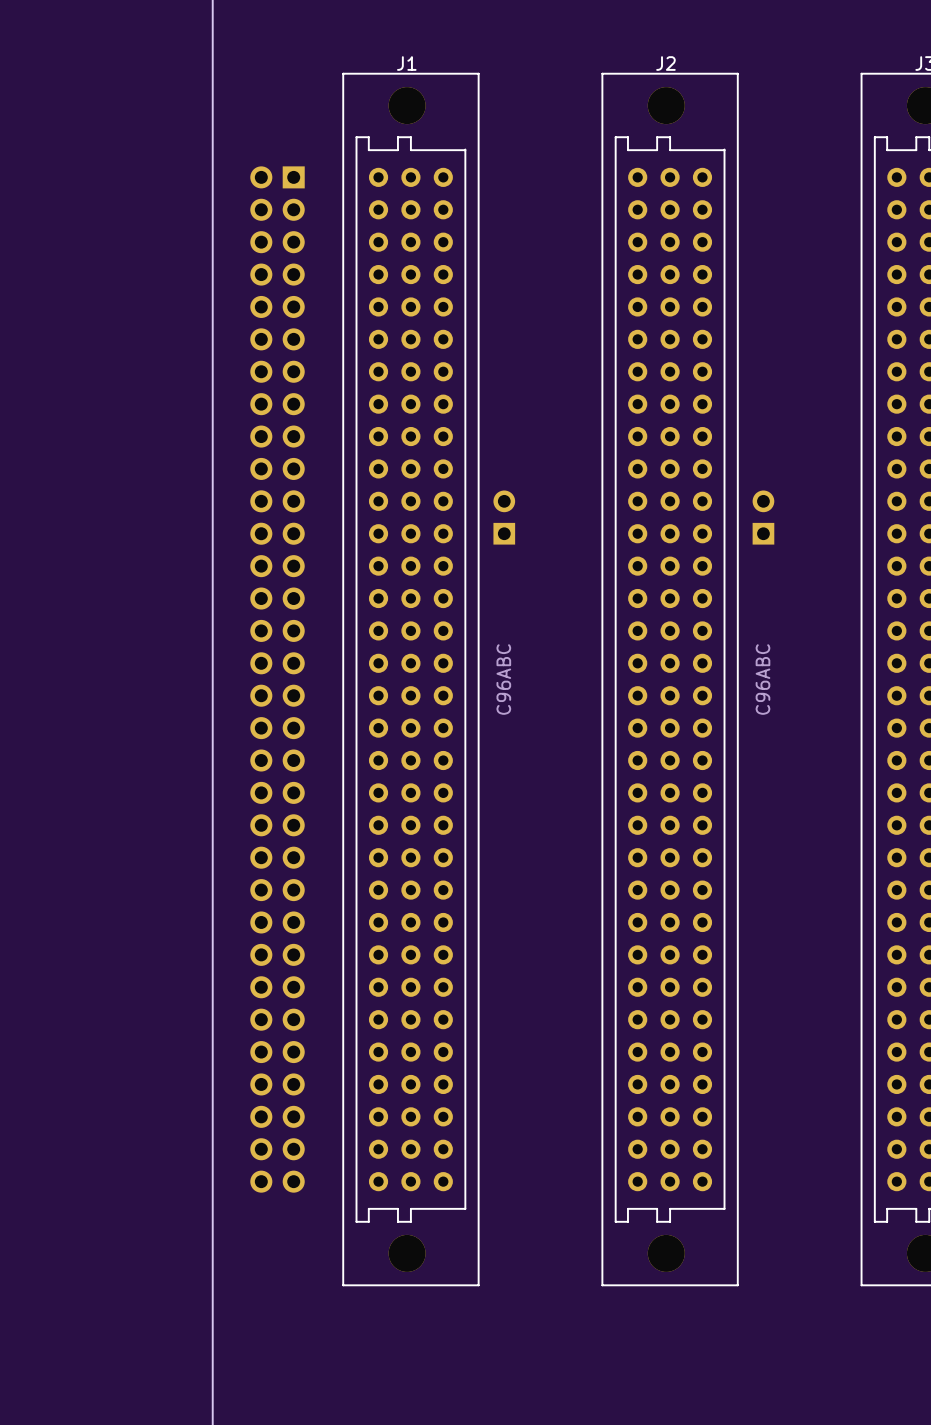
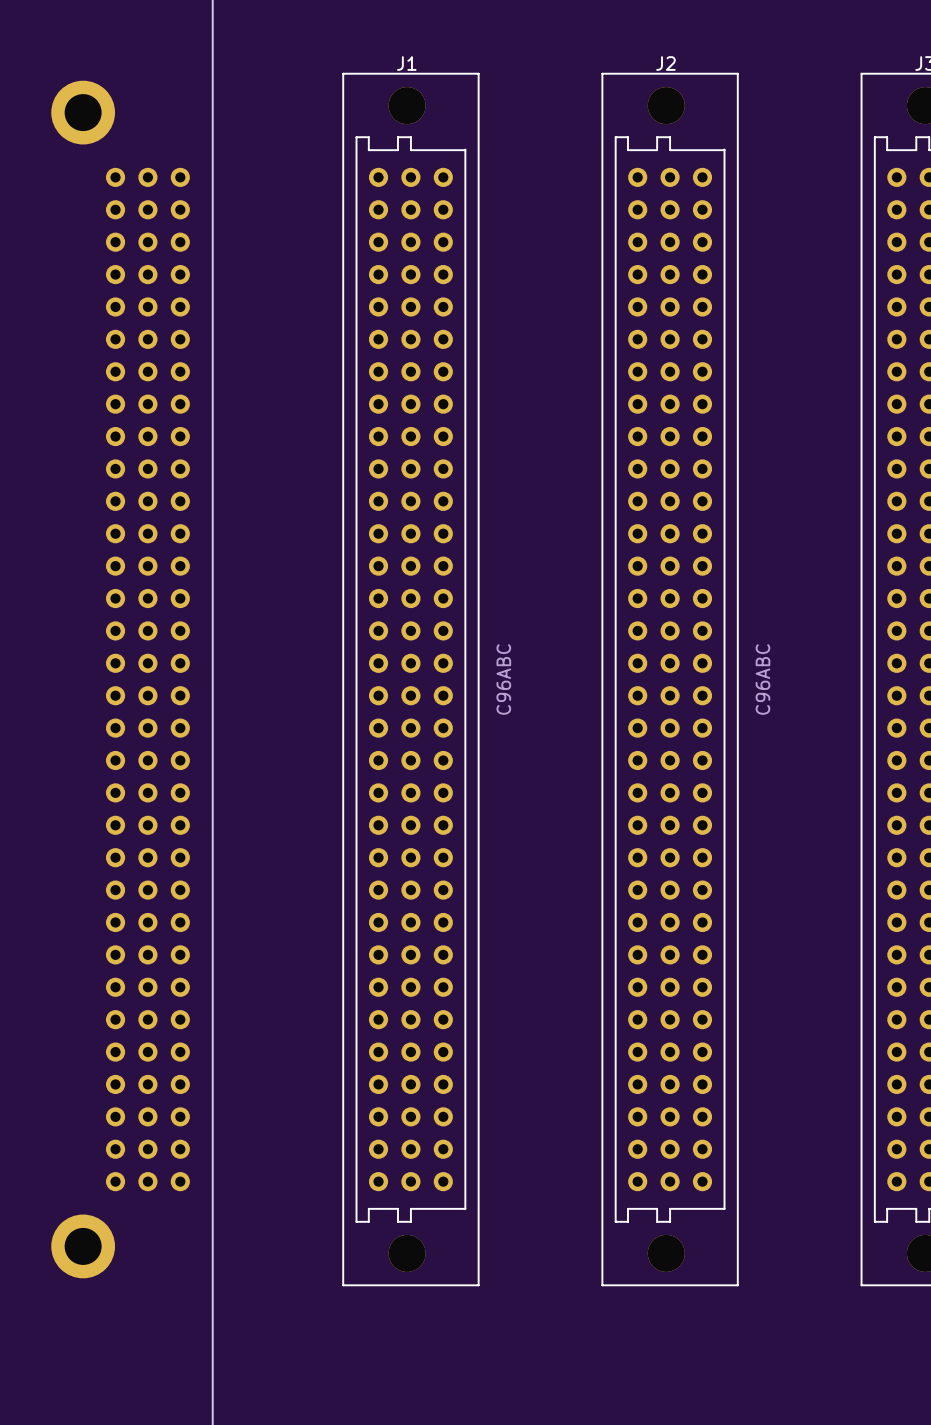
part: (504, 517) -> none
part: (763, 517) -> none
part: none -> (120, 679)
part: (277, 679) -> none

